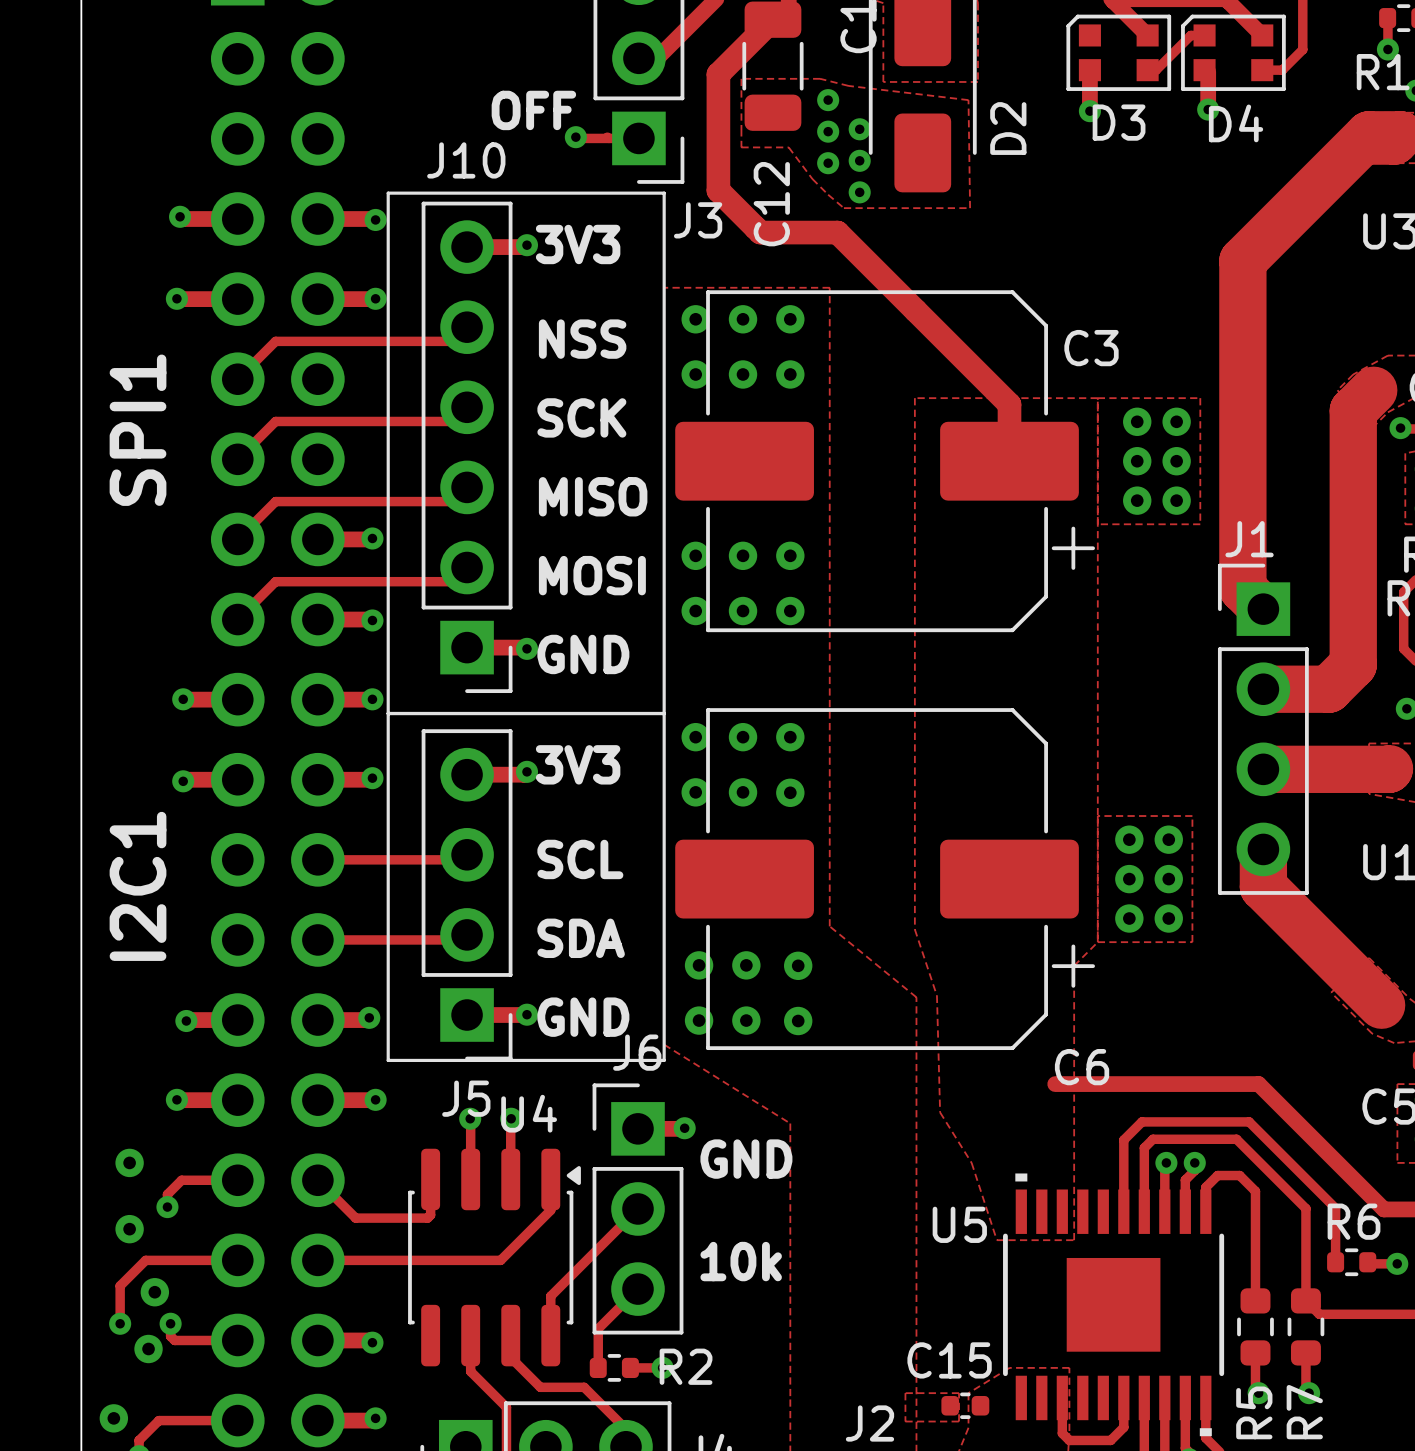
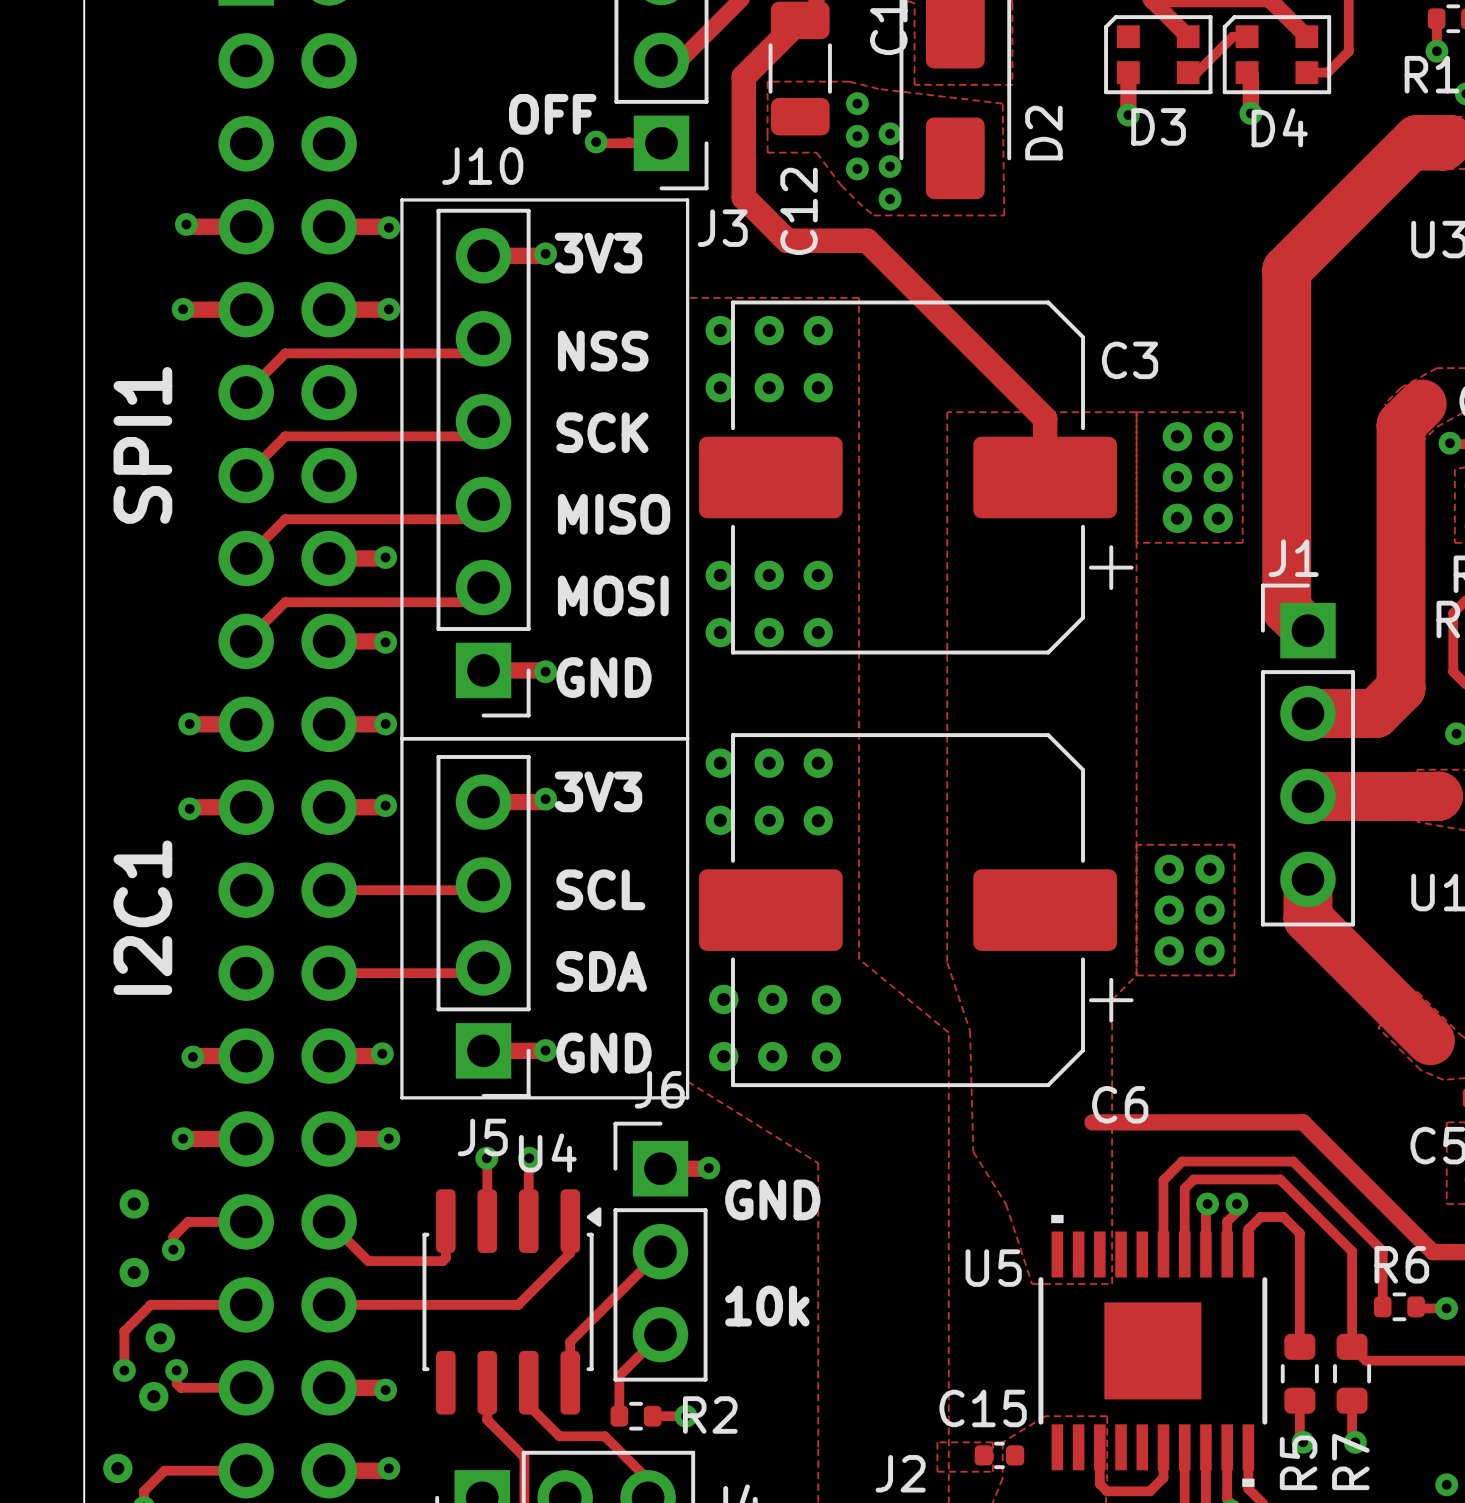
via: none -> (1446, 1484)

